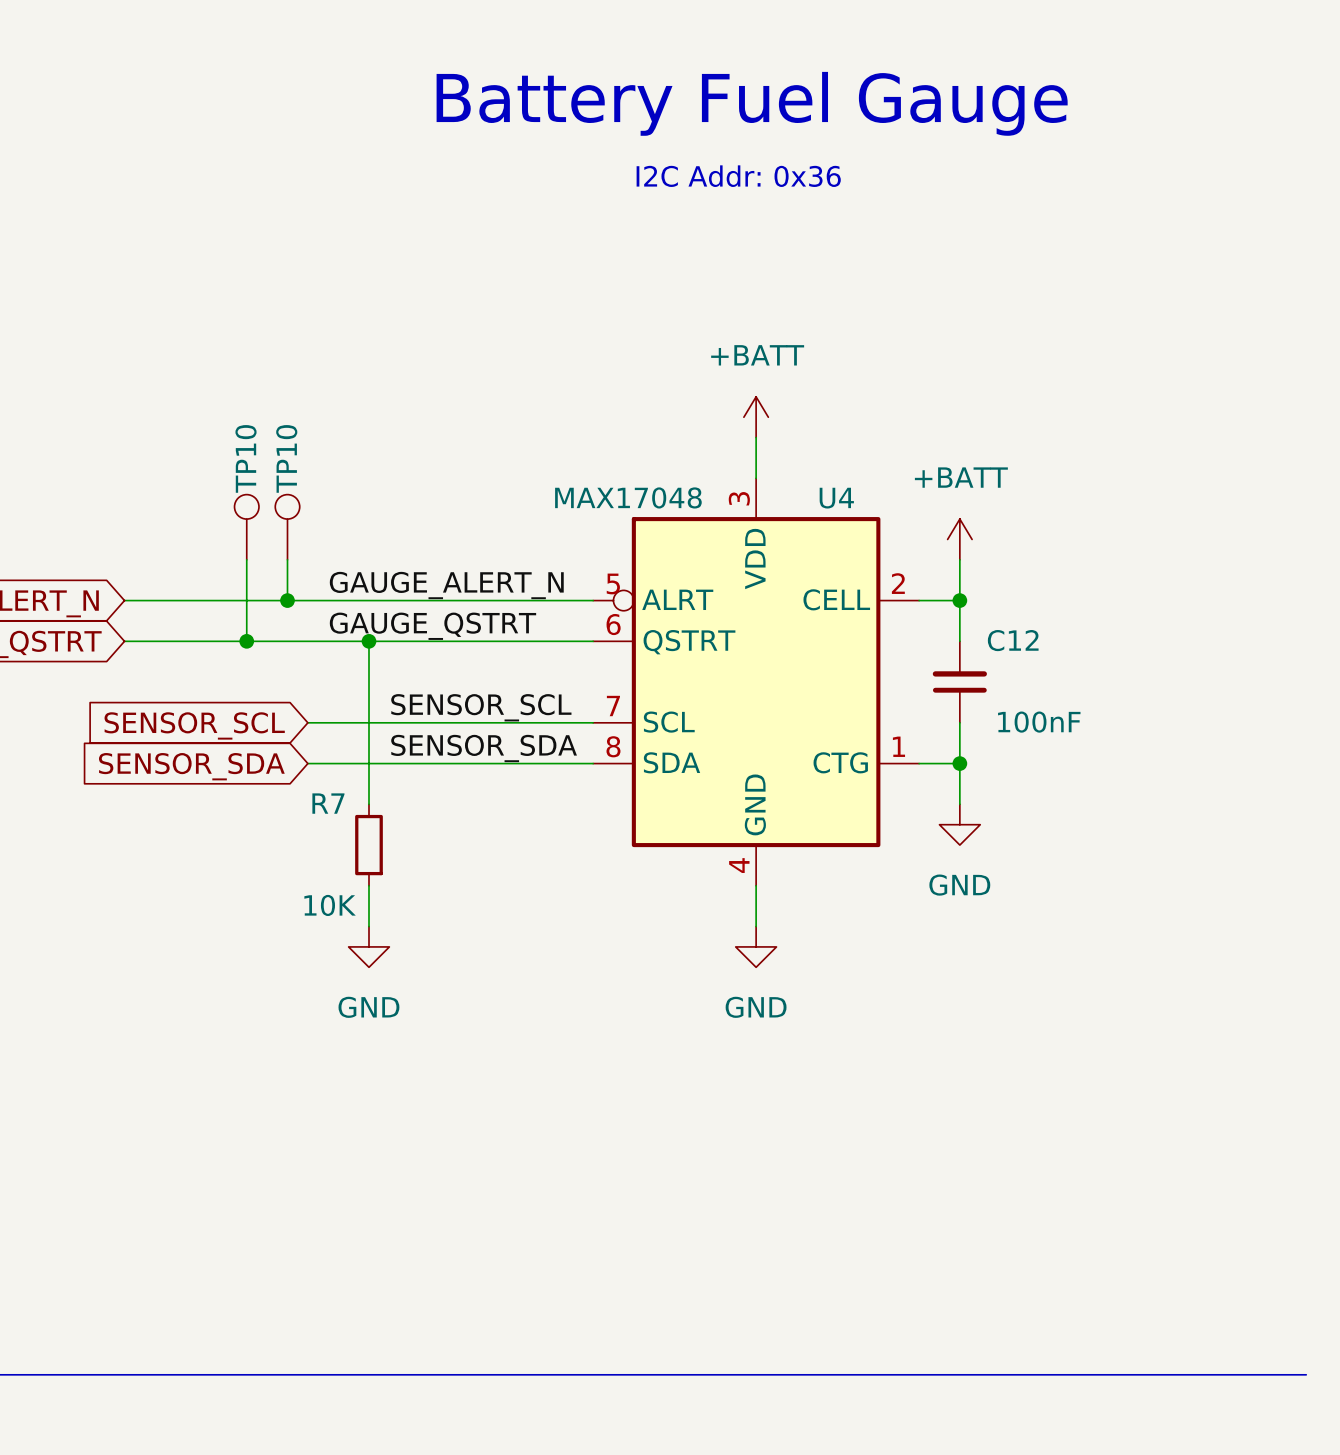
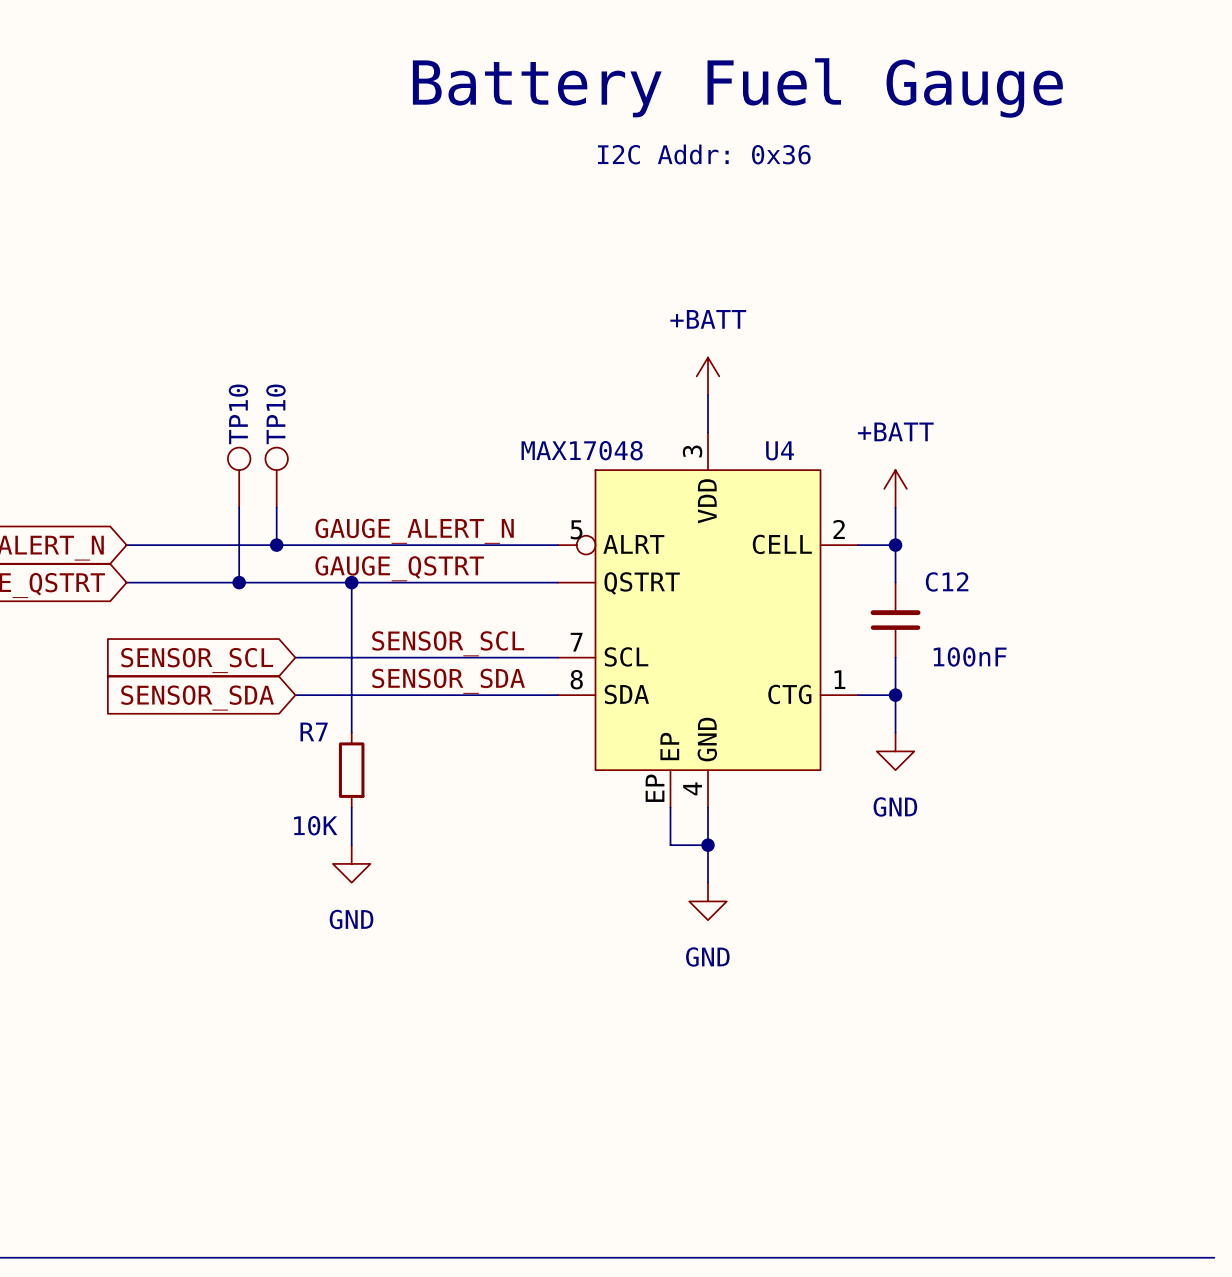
U4 symbol: [593, 478, 920, 886] -> [557, 432, 859, 808]
wire: none -> (670, 807) (670, 845) (708, 845) (708, 882)
junction: none -> (708, 845)
power symbol position: GND (756, 946) -> GND (708, 901)

